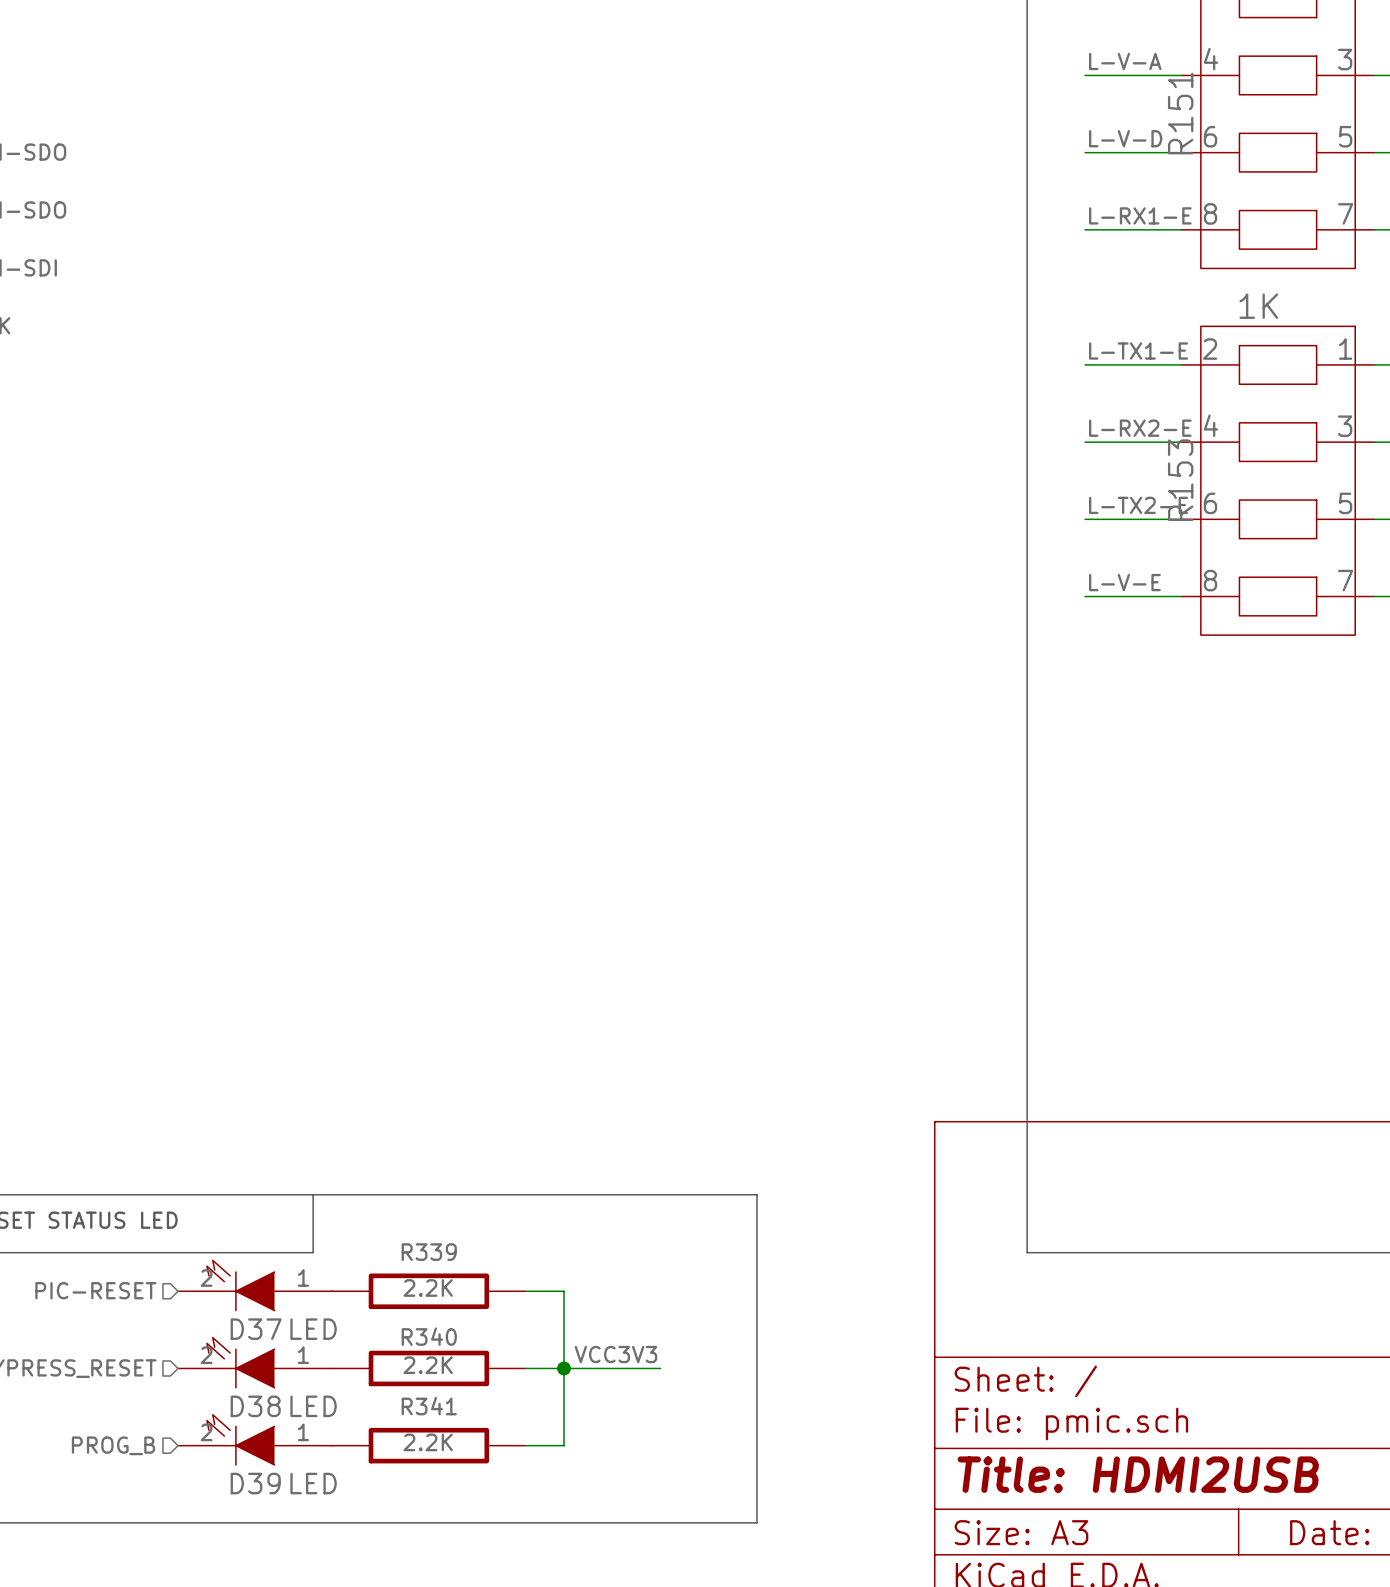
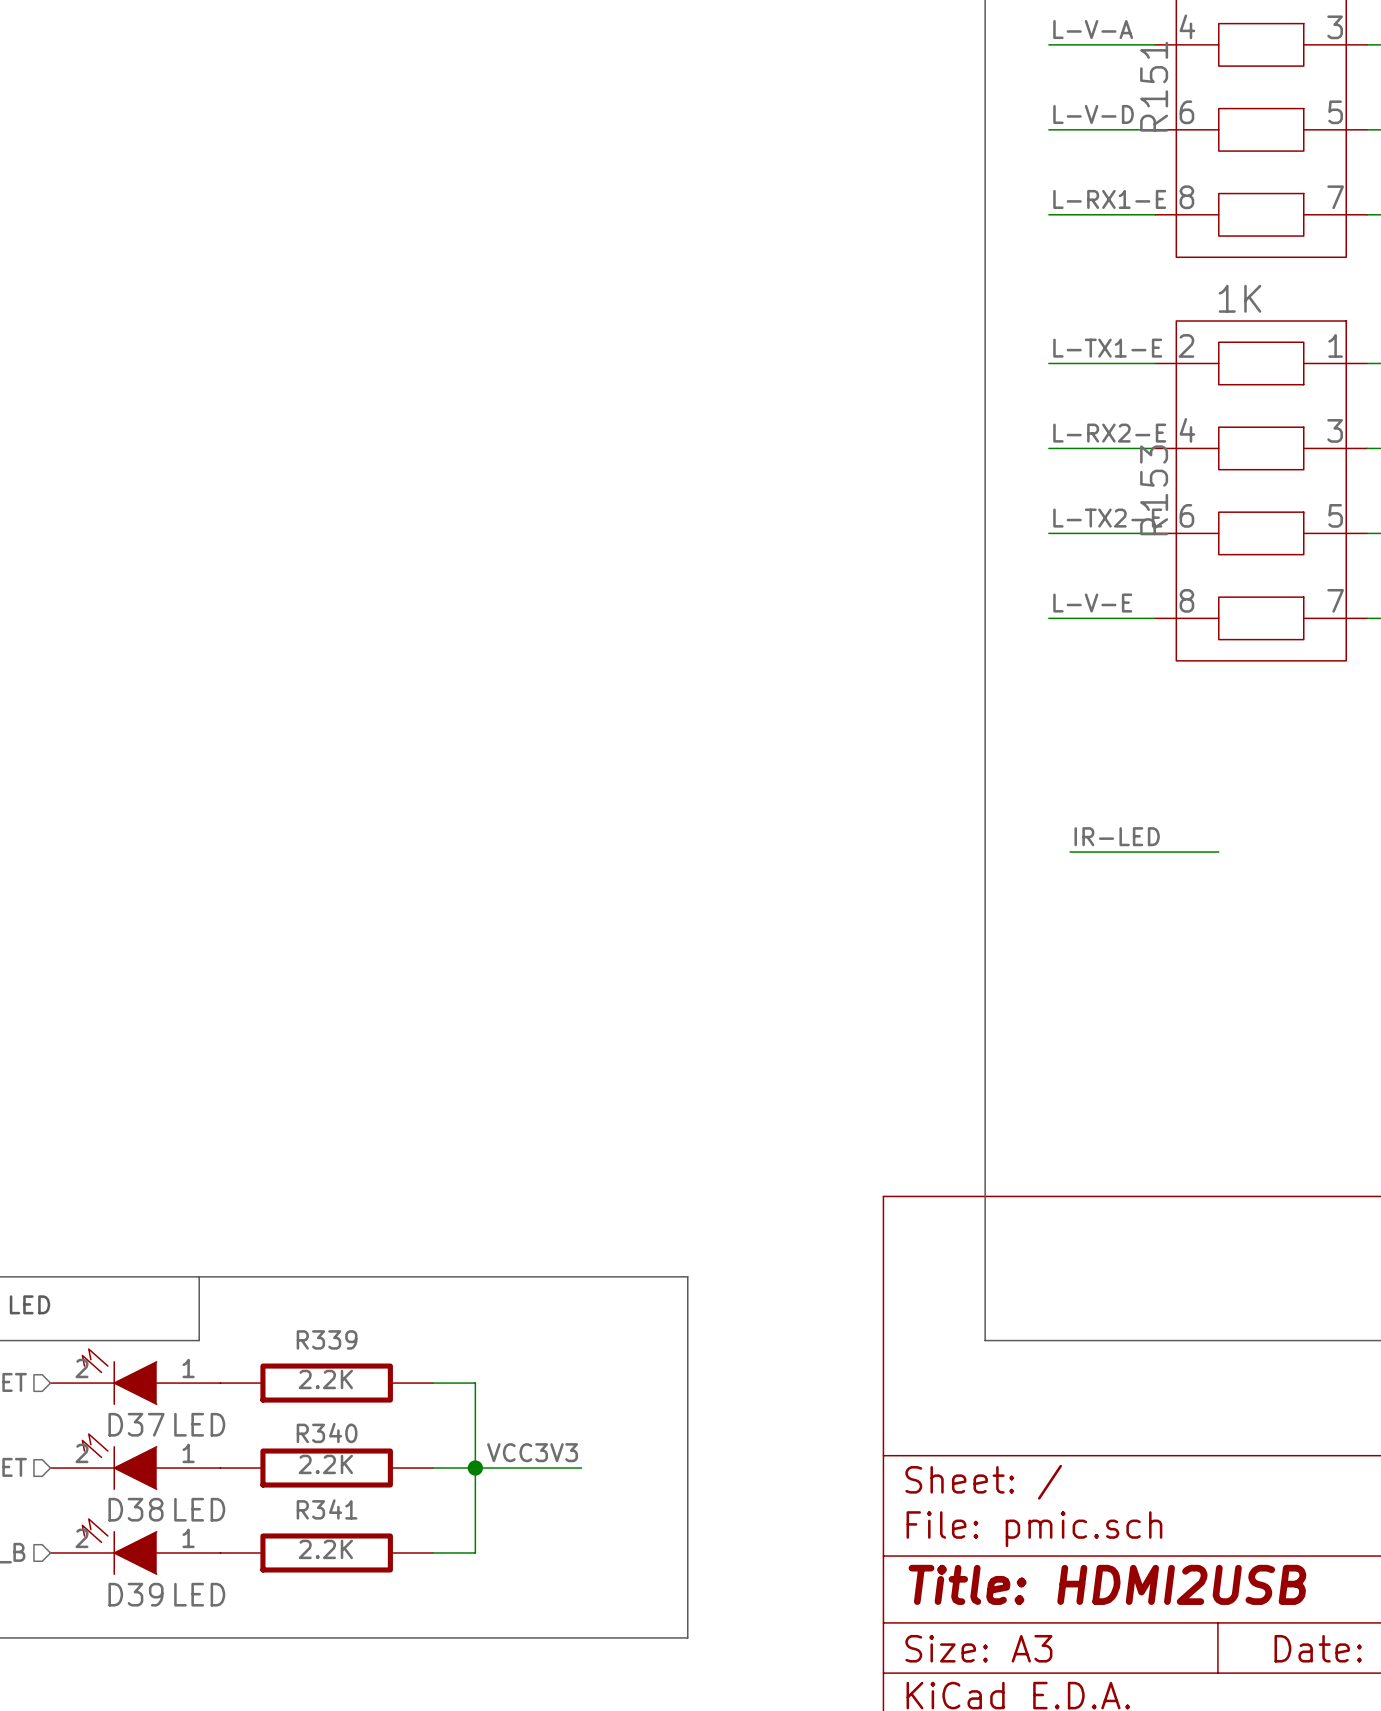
label: none -> IR-LED (1117, 836)
wire: none -> (1070, 852) (1218, 852)

